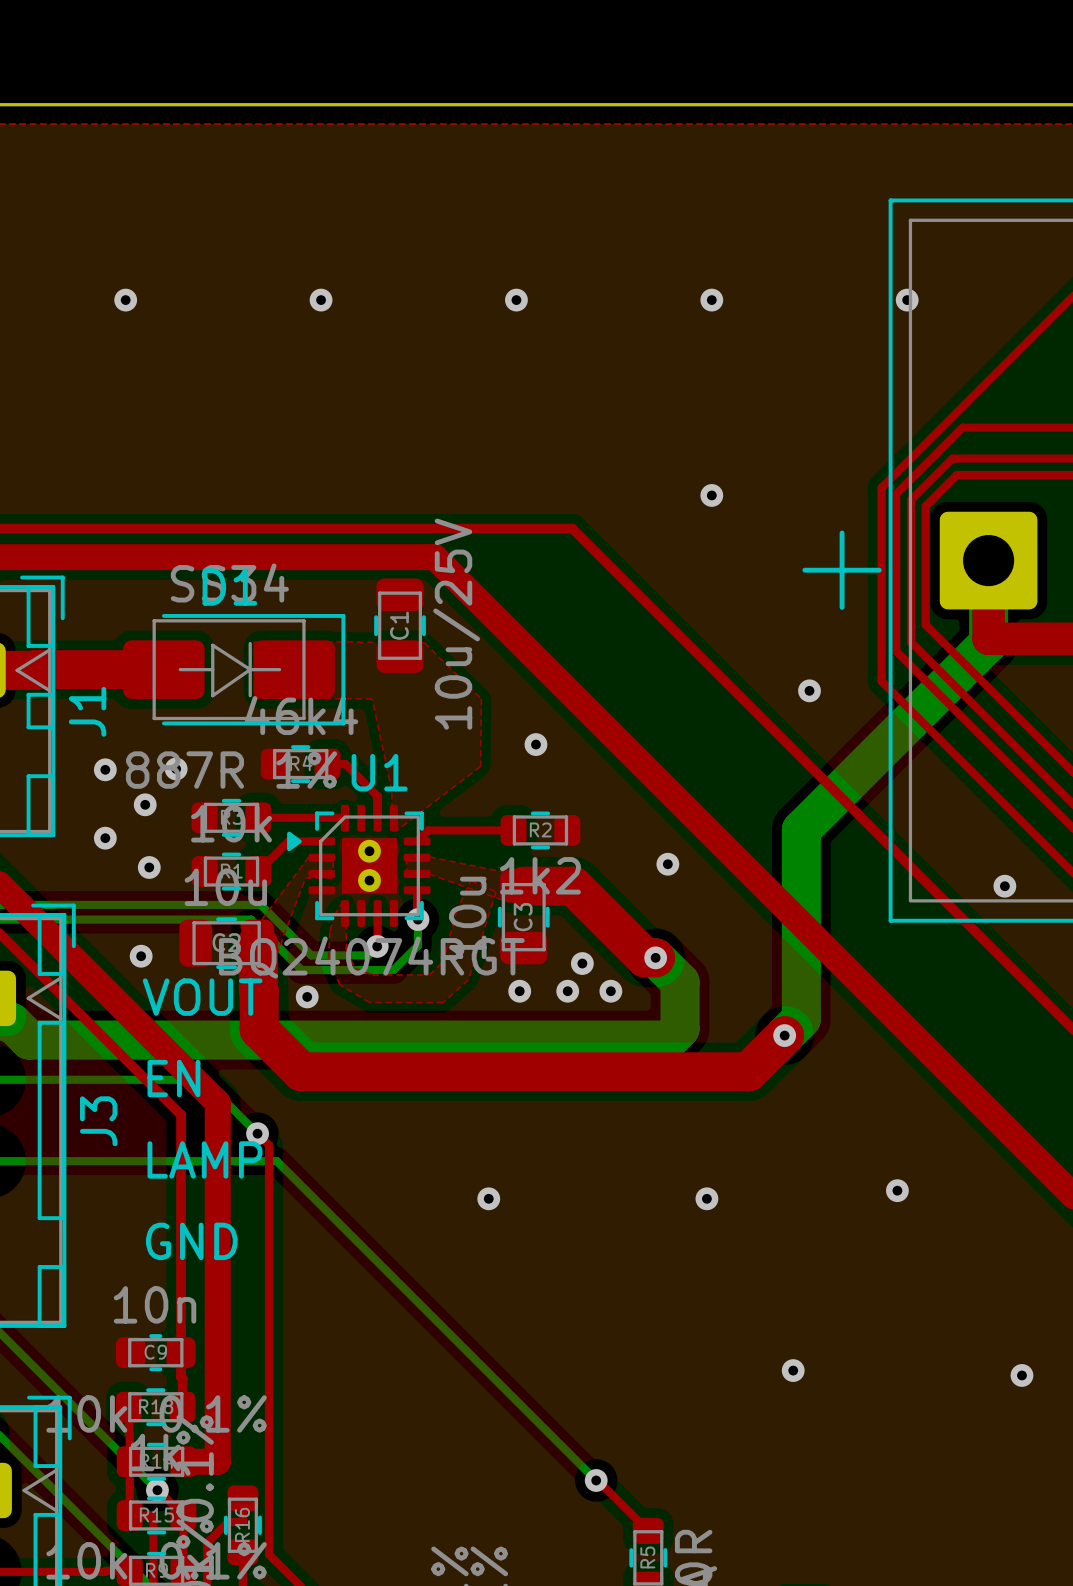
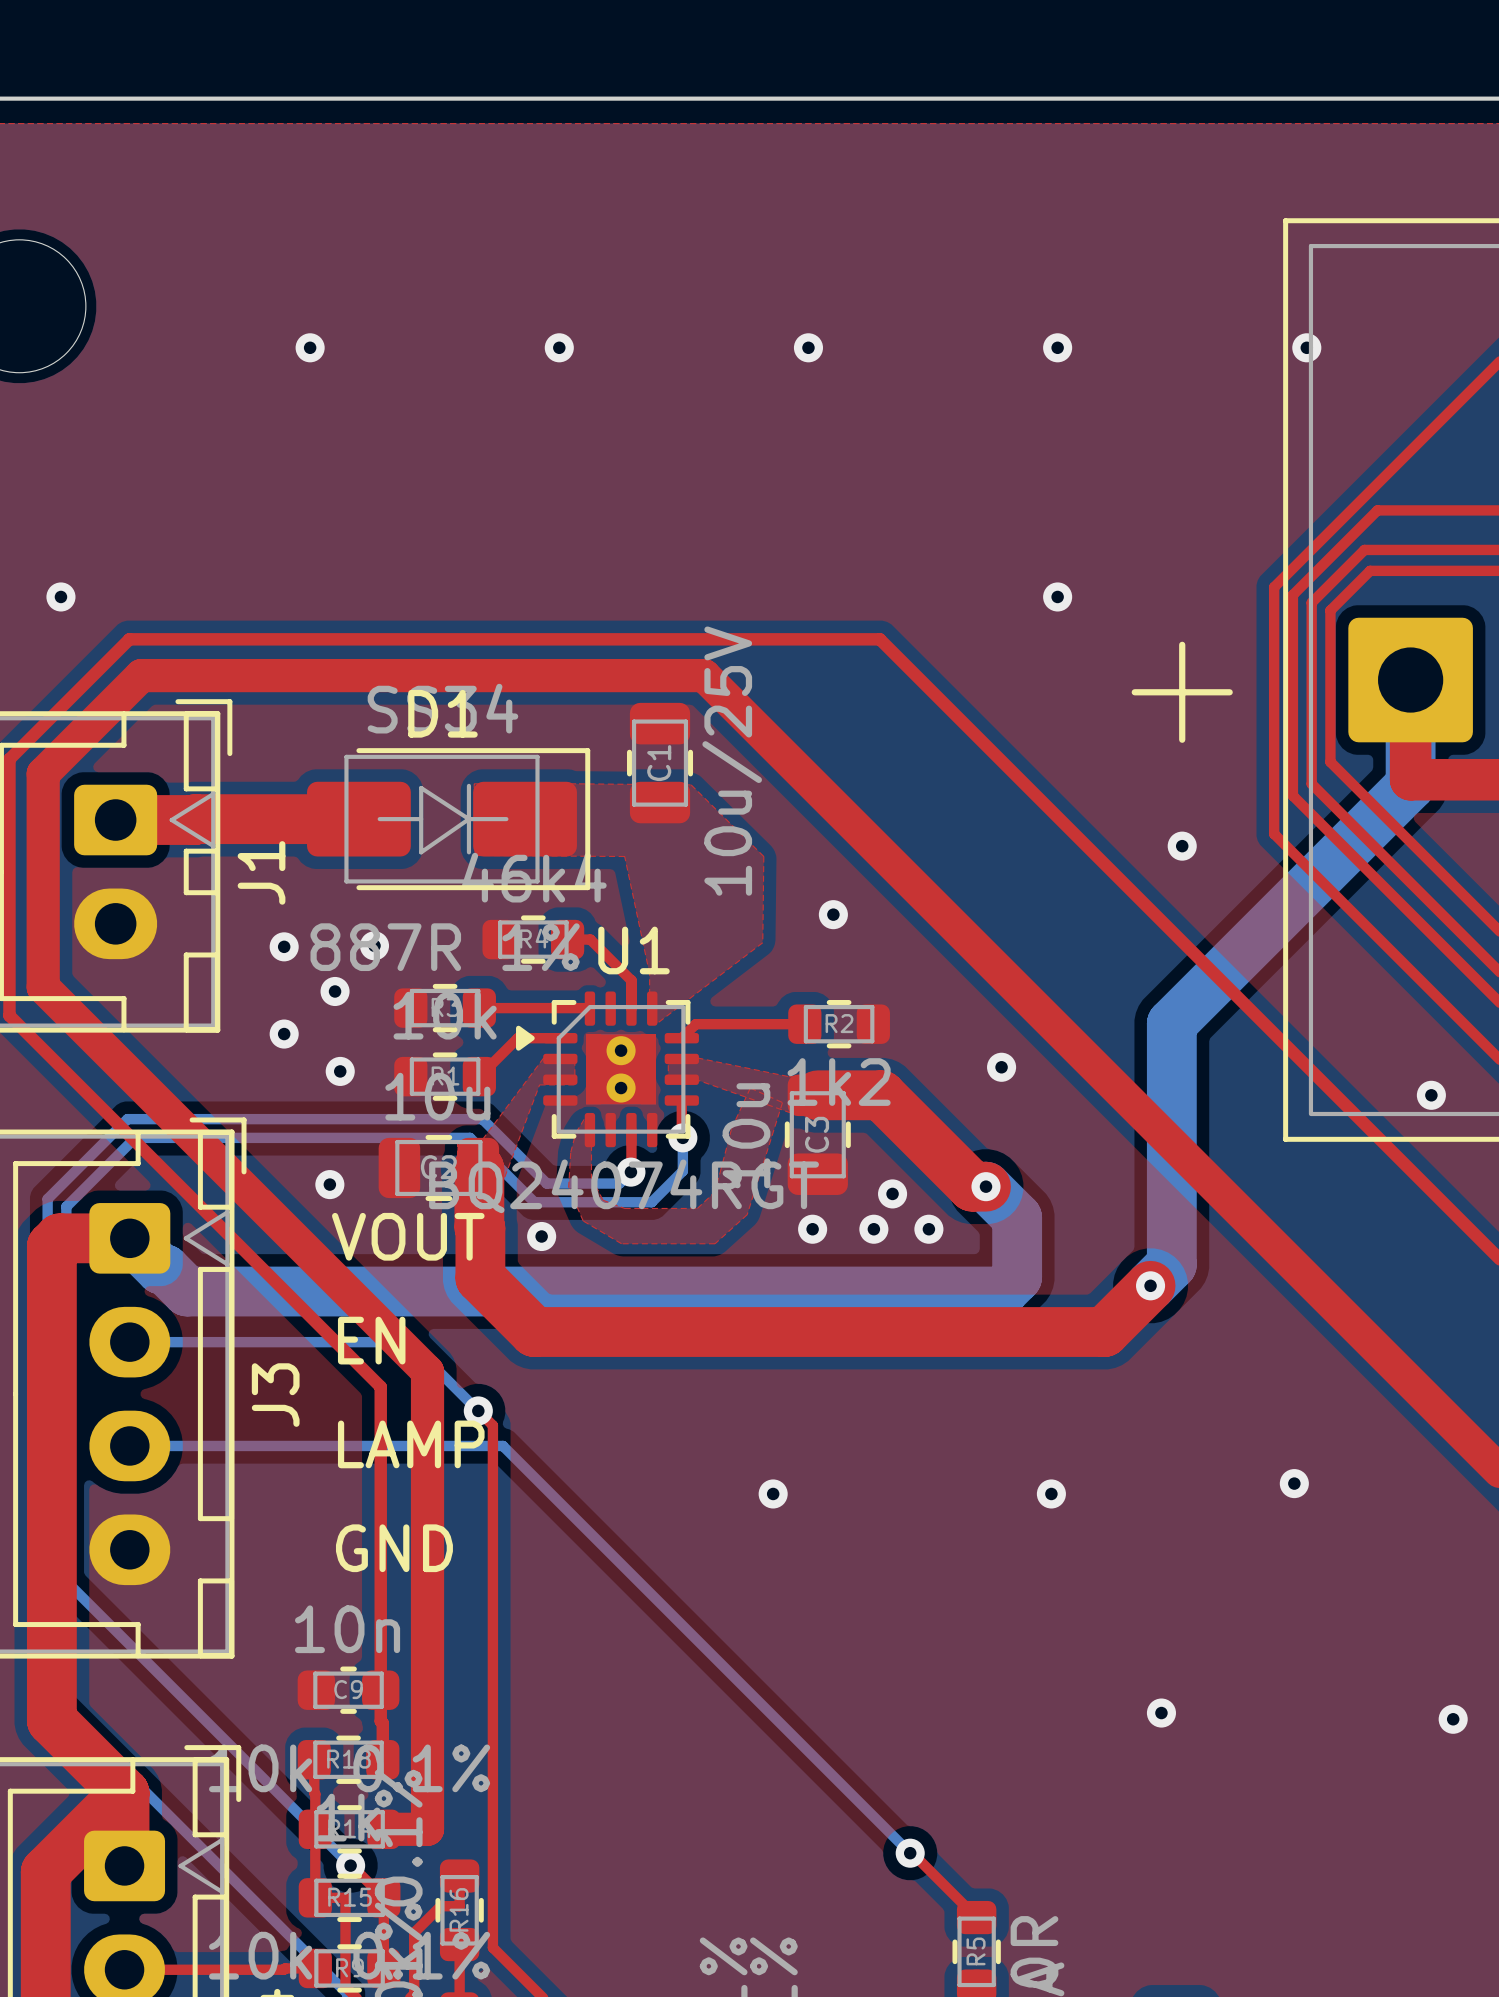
part text position: + (842, 570) -> + (1182, 692)

